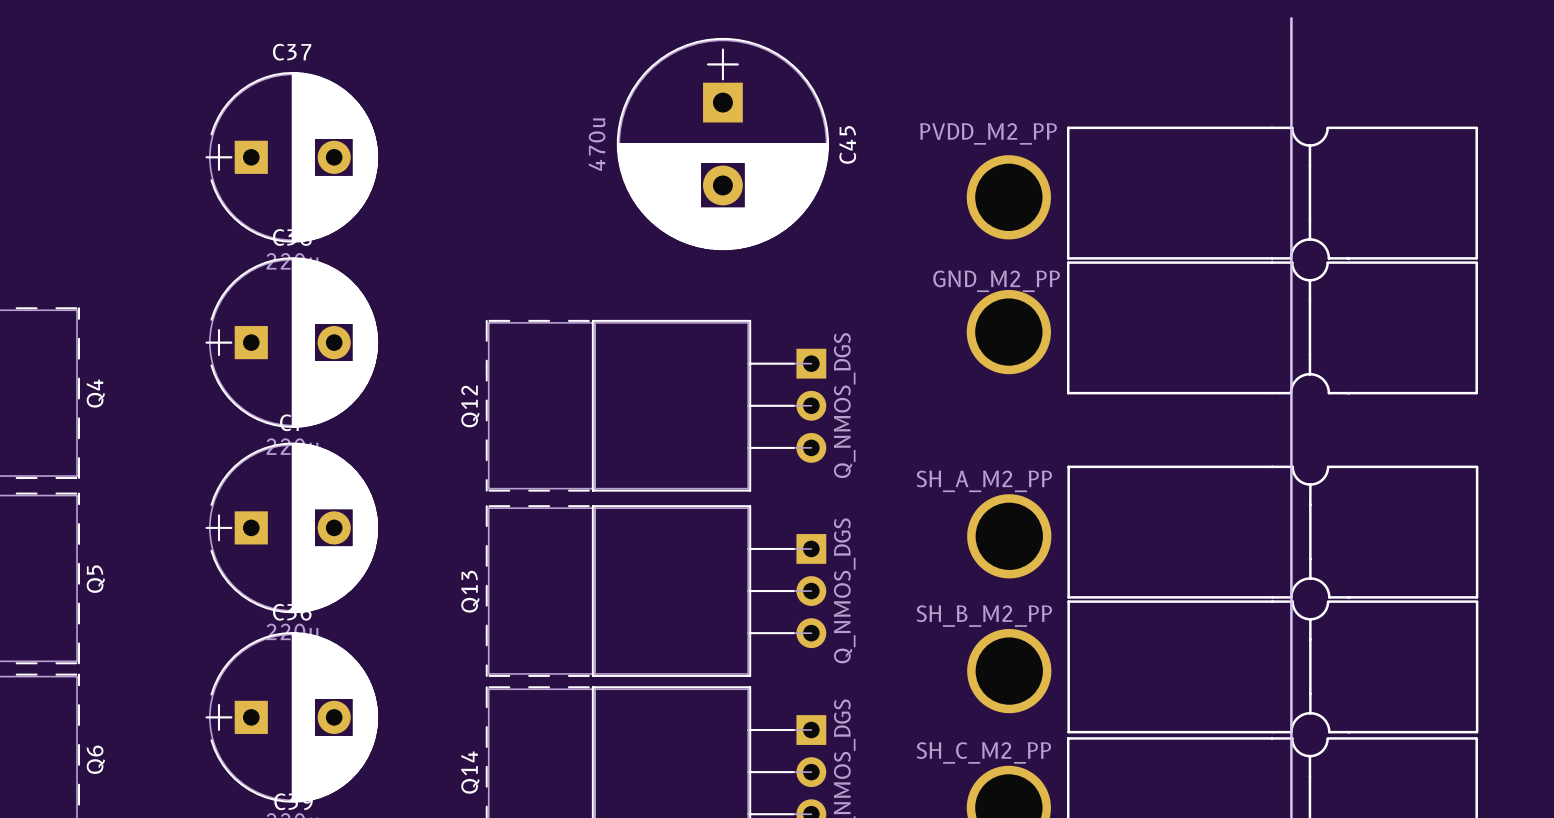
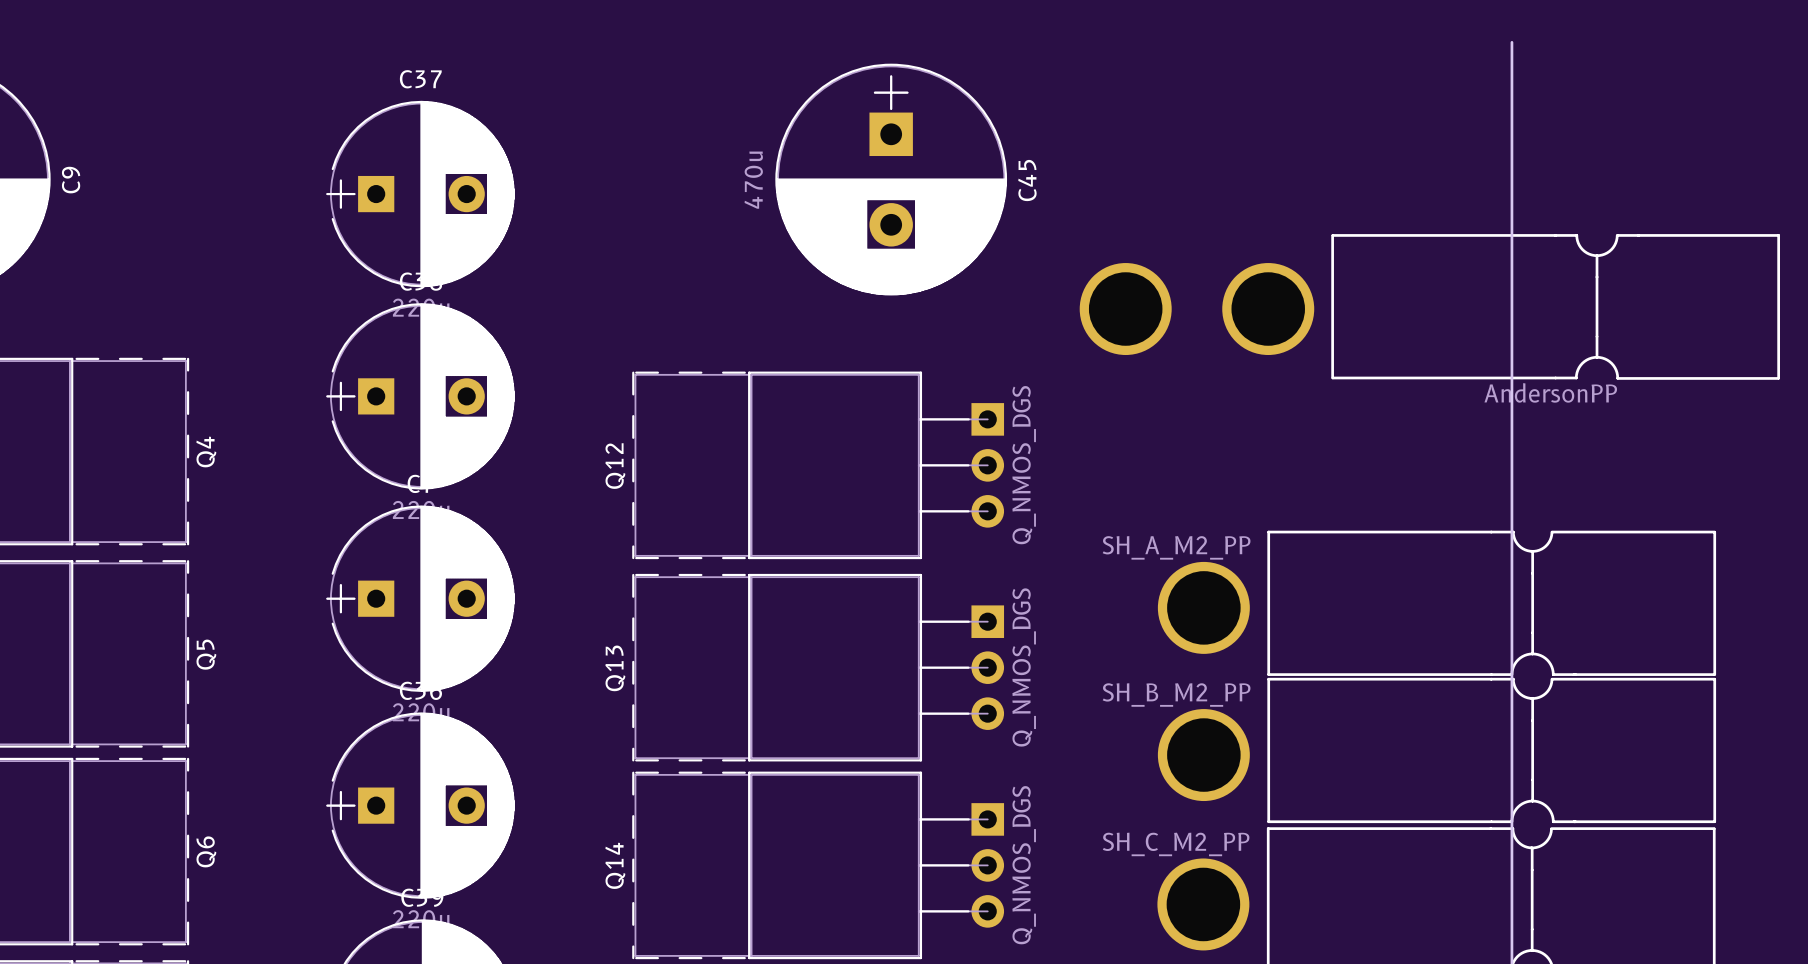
part: PVDD_M2_PP (1222, 193) -> none
part: none -> AndersonPP (1429, 306)
part: GND_M2_PP (1222, 327) -> none

